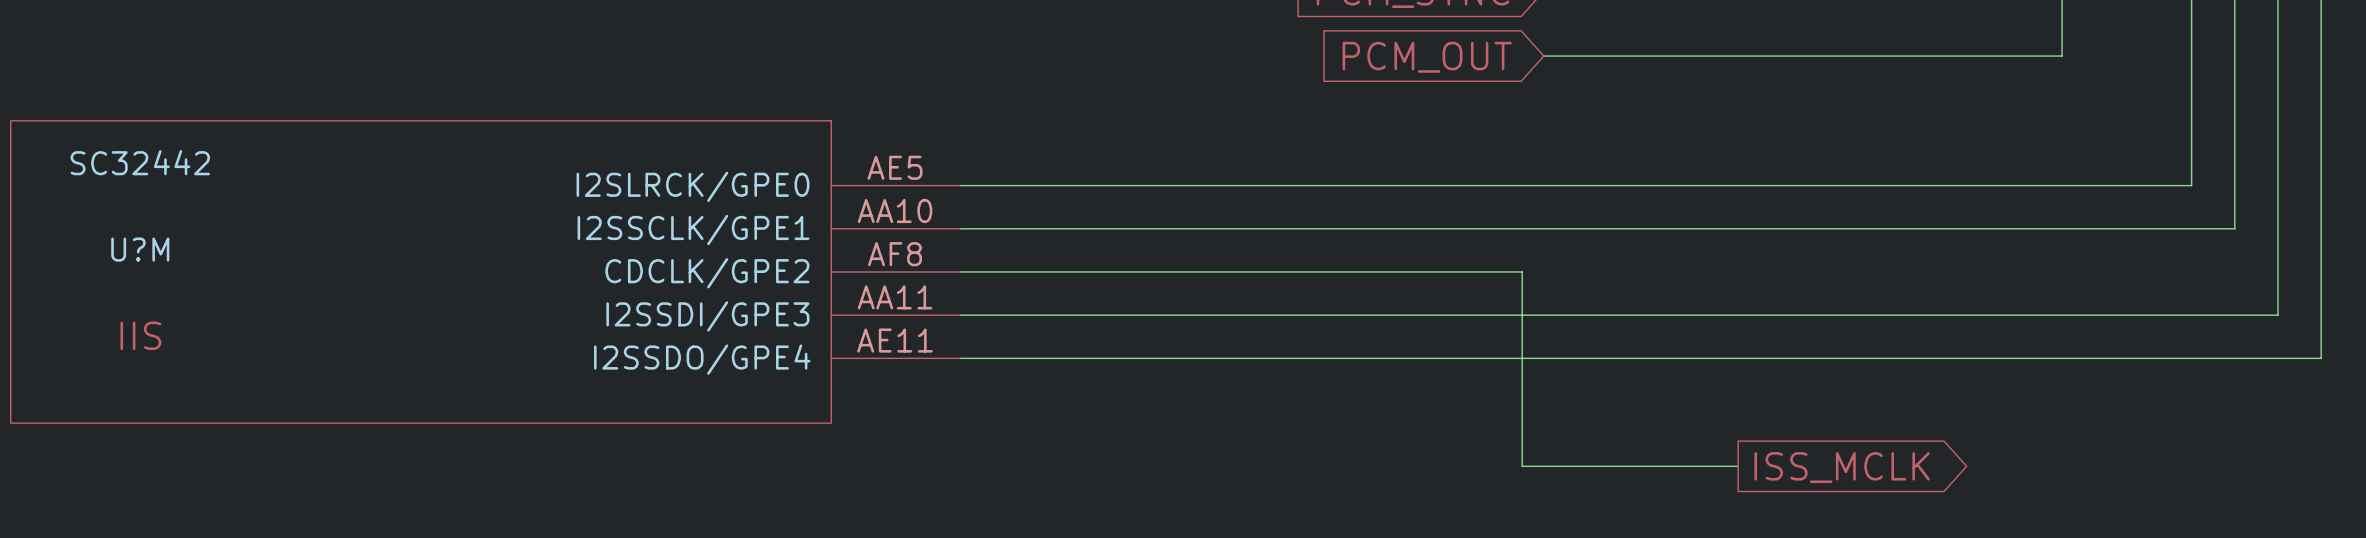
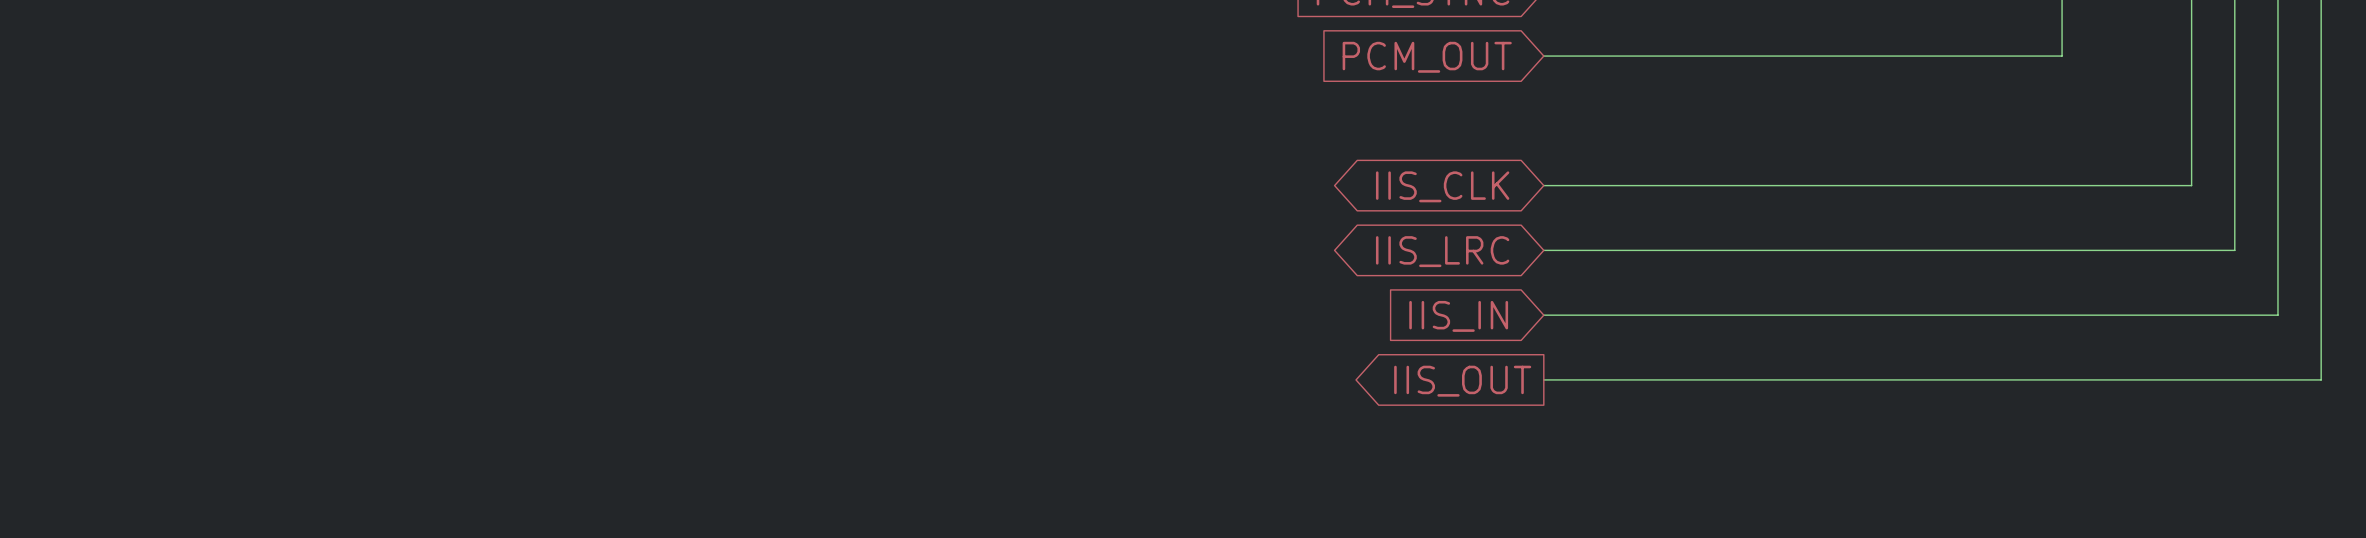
wire: (960, 185) (1543, 185) -> none
global label: none -> IIS_CLK (1442, 186)
wire: (960, 228) (2234, 228) -> (1543, 250) (2234, 250) (2234, 228)
global label: none -> IIS_LRC (1442, 251)
U?M: SC32442 (485, 271) -> none
wire: (960, 271) (1522, 271) (1522, 466) (1738, 466) -> none
wire: (960, 315) (1543, 315) -> none
global label: none -> IIS_IN (1458, 316)
wire: (960, 358) (2321, 358) -> (1543, 379) (2321, 379) (2321, 358)
global label: none -> IIS_OUT (1462, 381)
global label: ISS_MCLK (1842, 467) -> none

